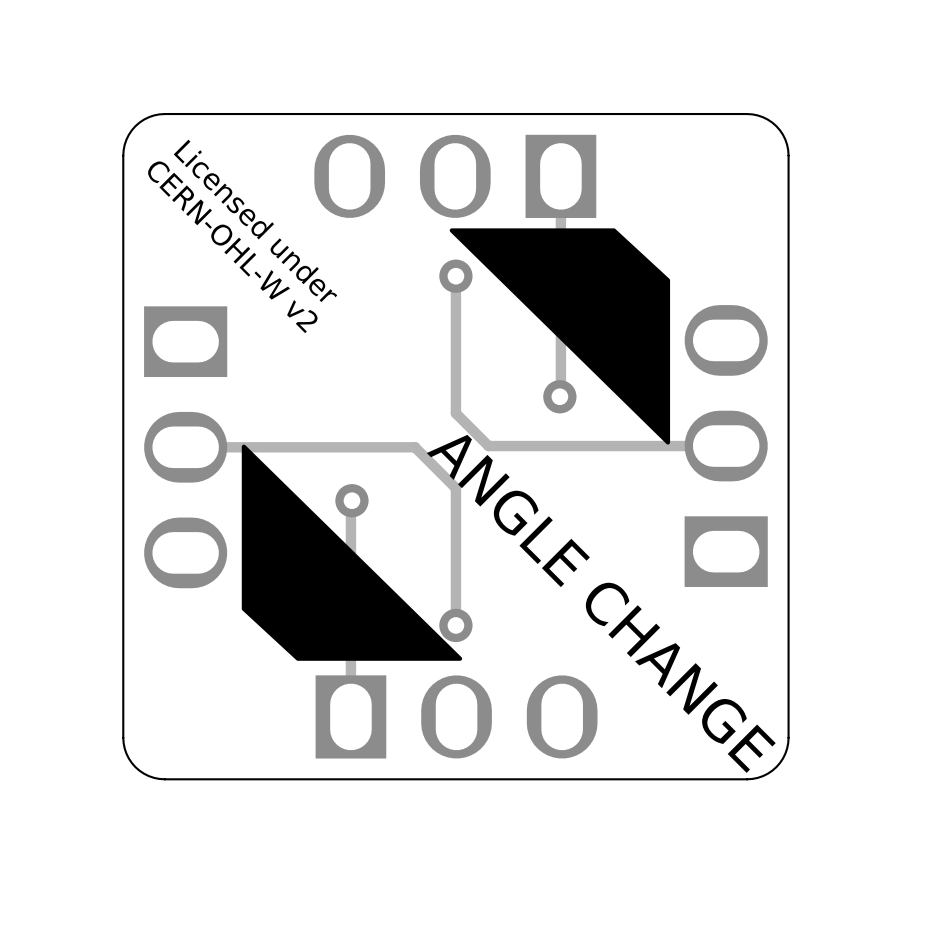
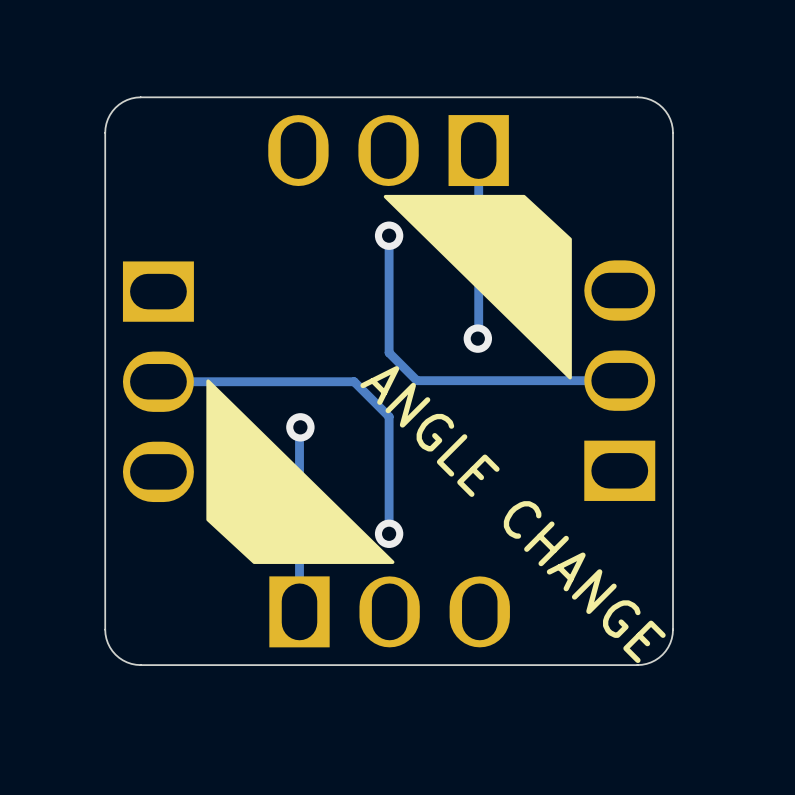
text: Licensed under (255, 220) -> none
text: CERN-OHL-W v2 (232, 247) -> none

